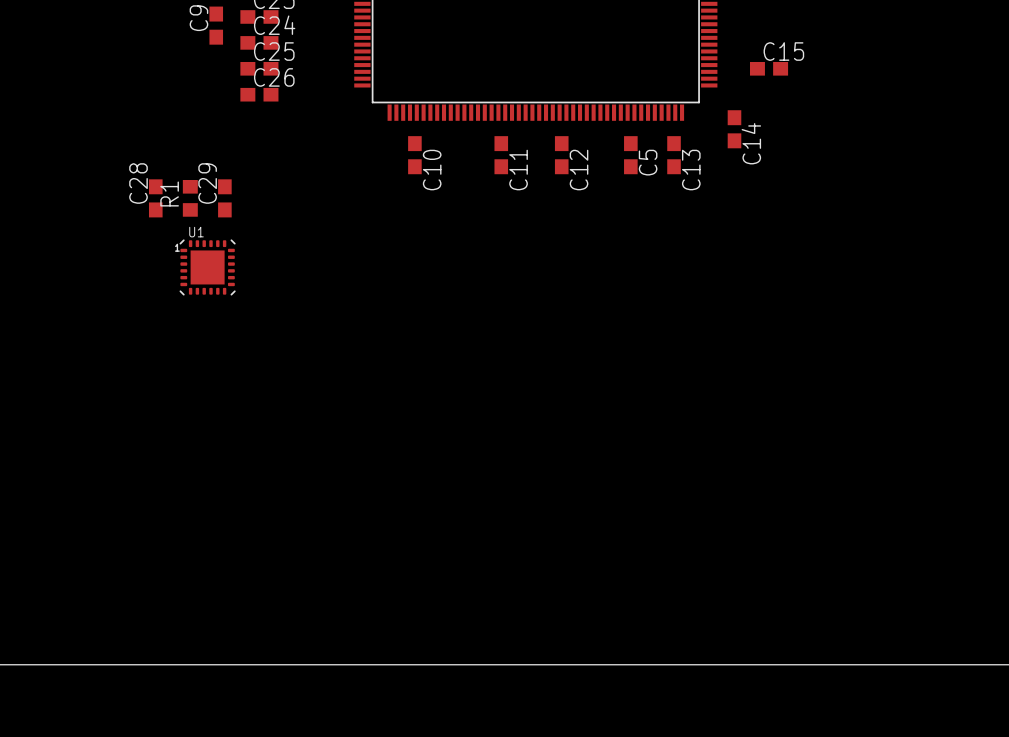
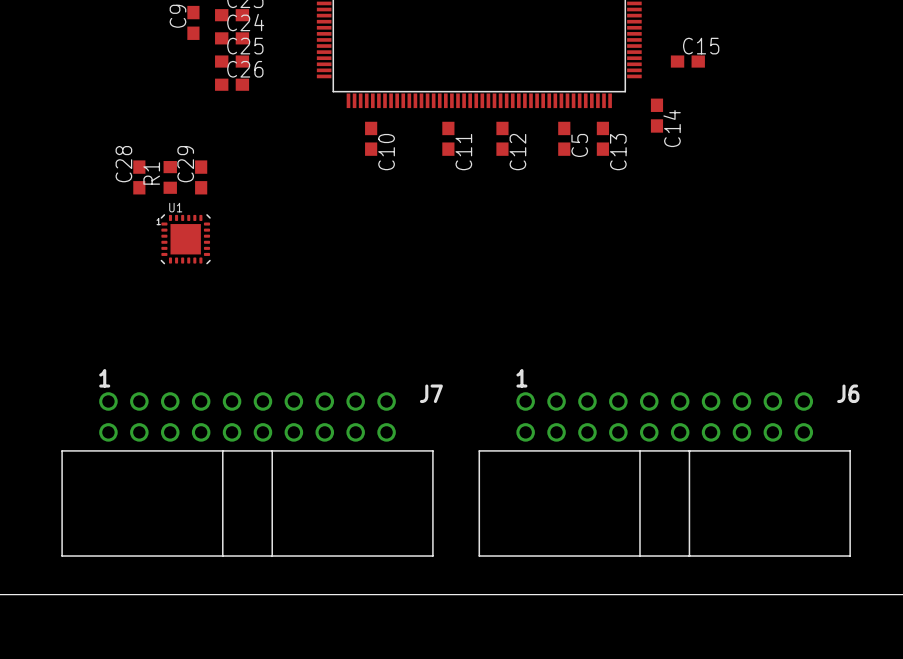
J7: none -> (247, 474)
J6: none -> (664, 474)

